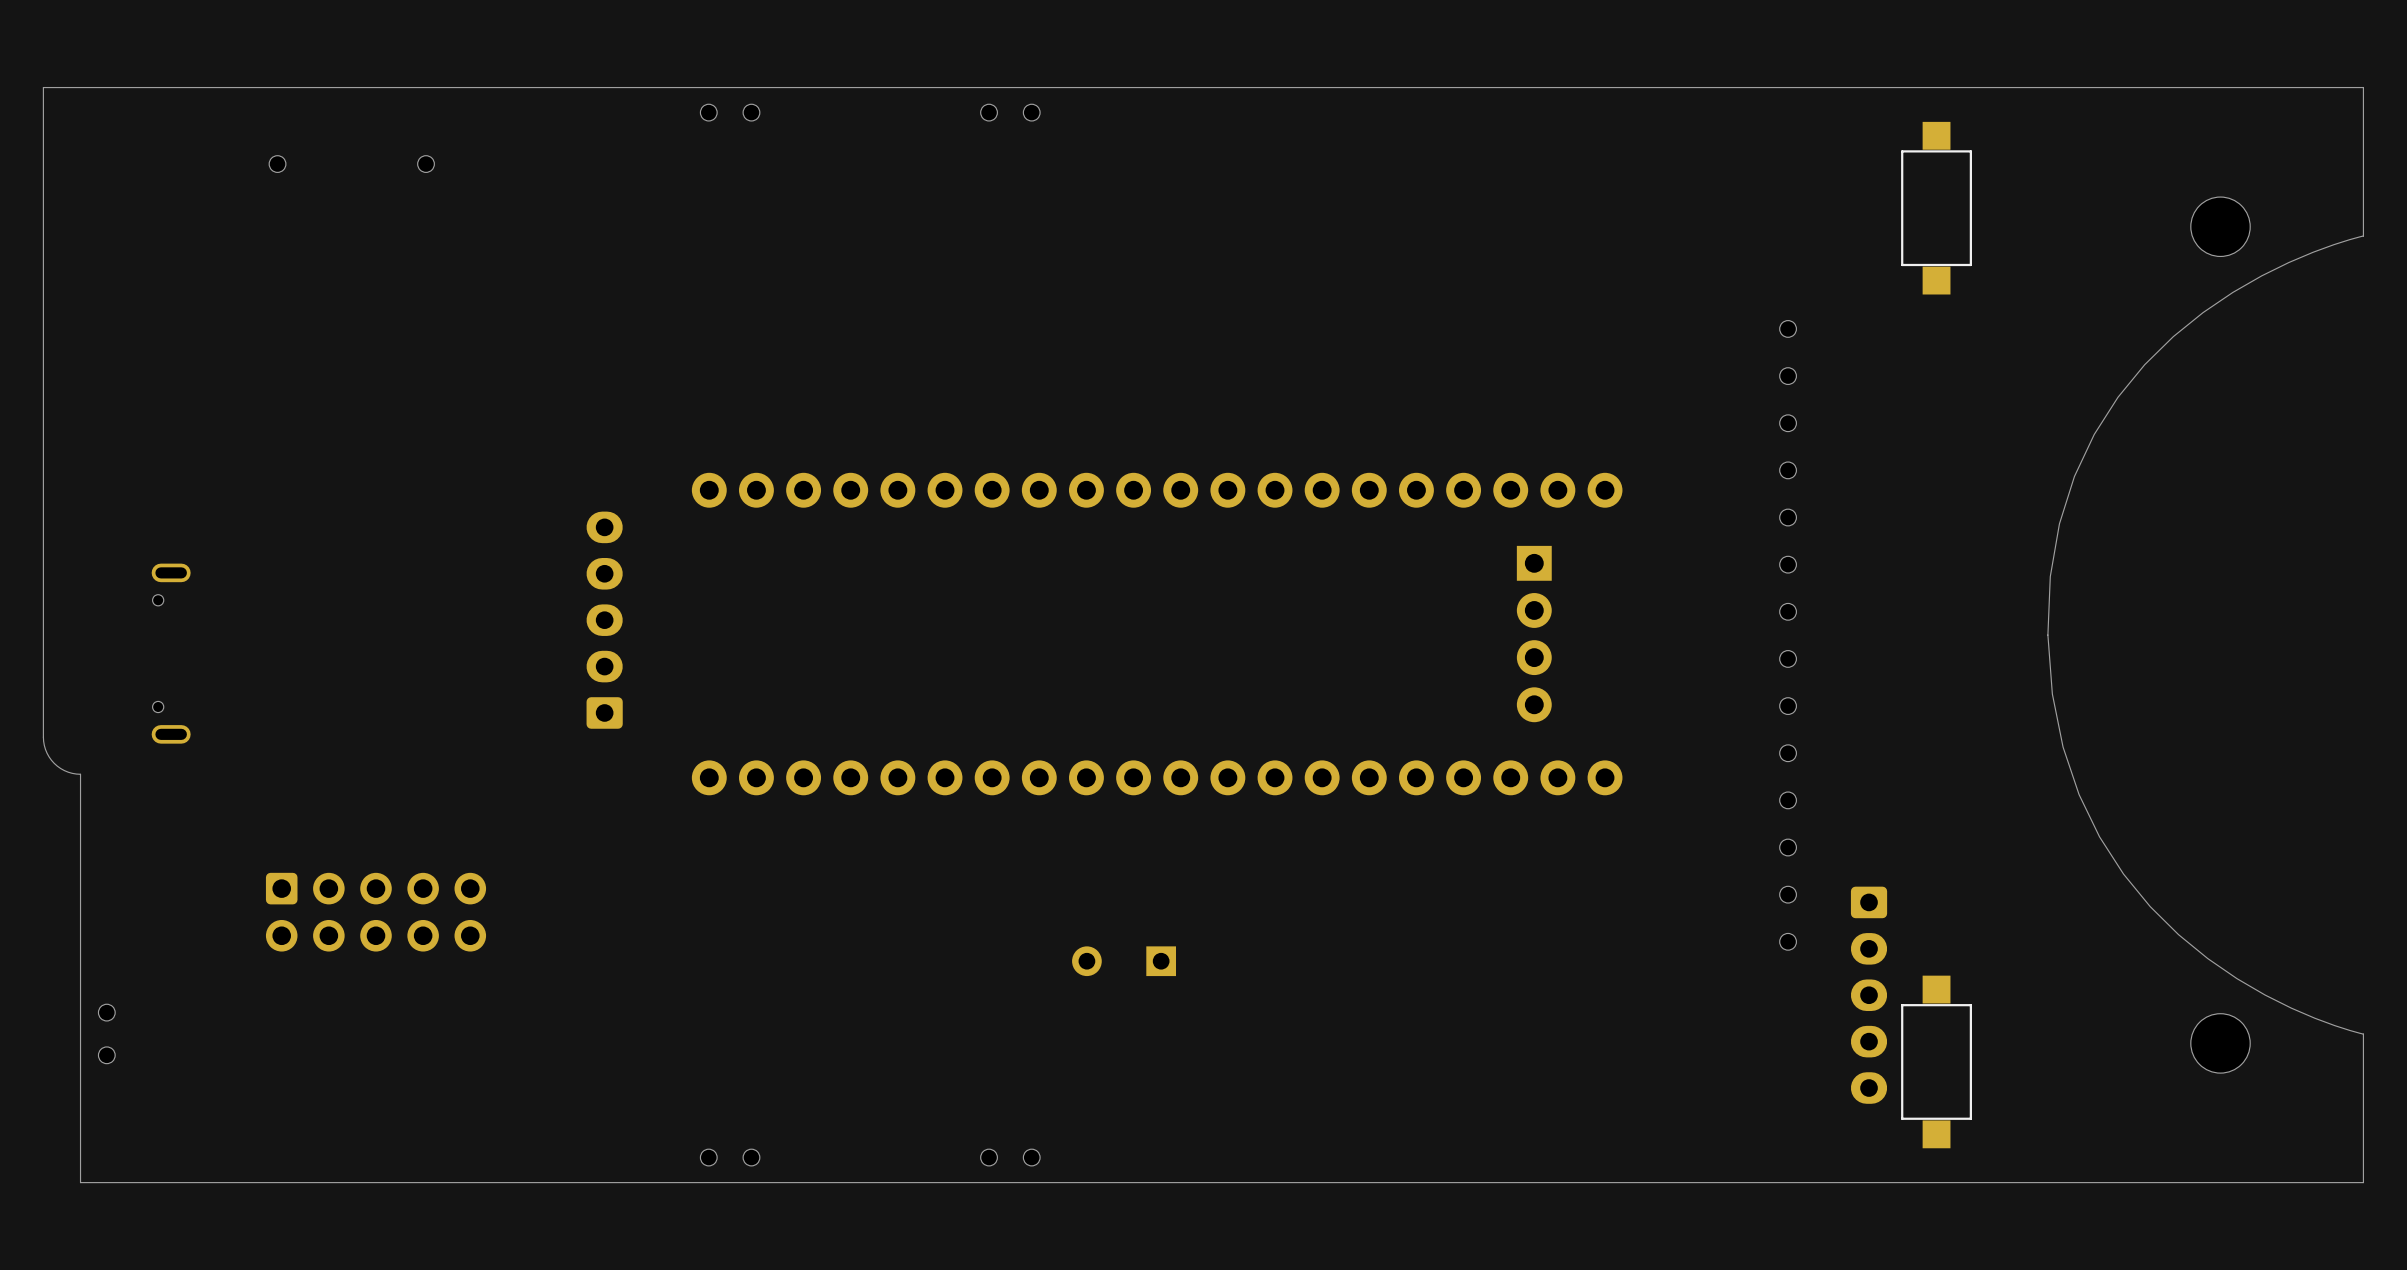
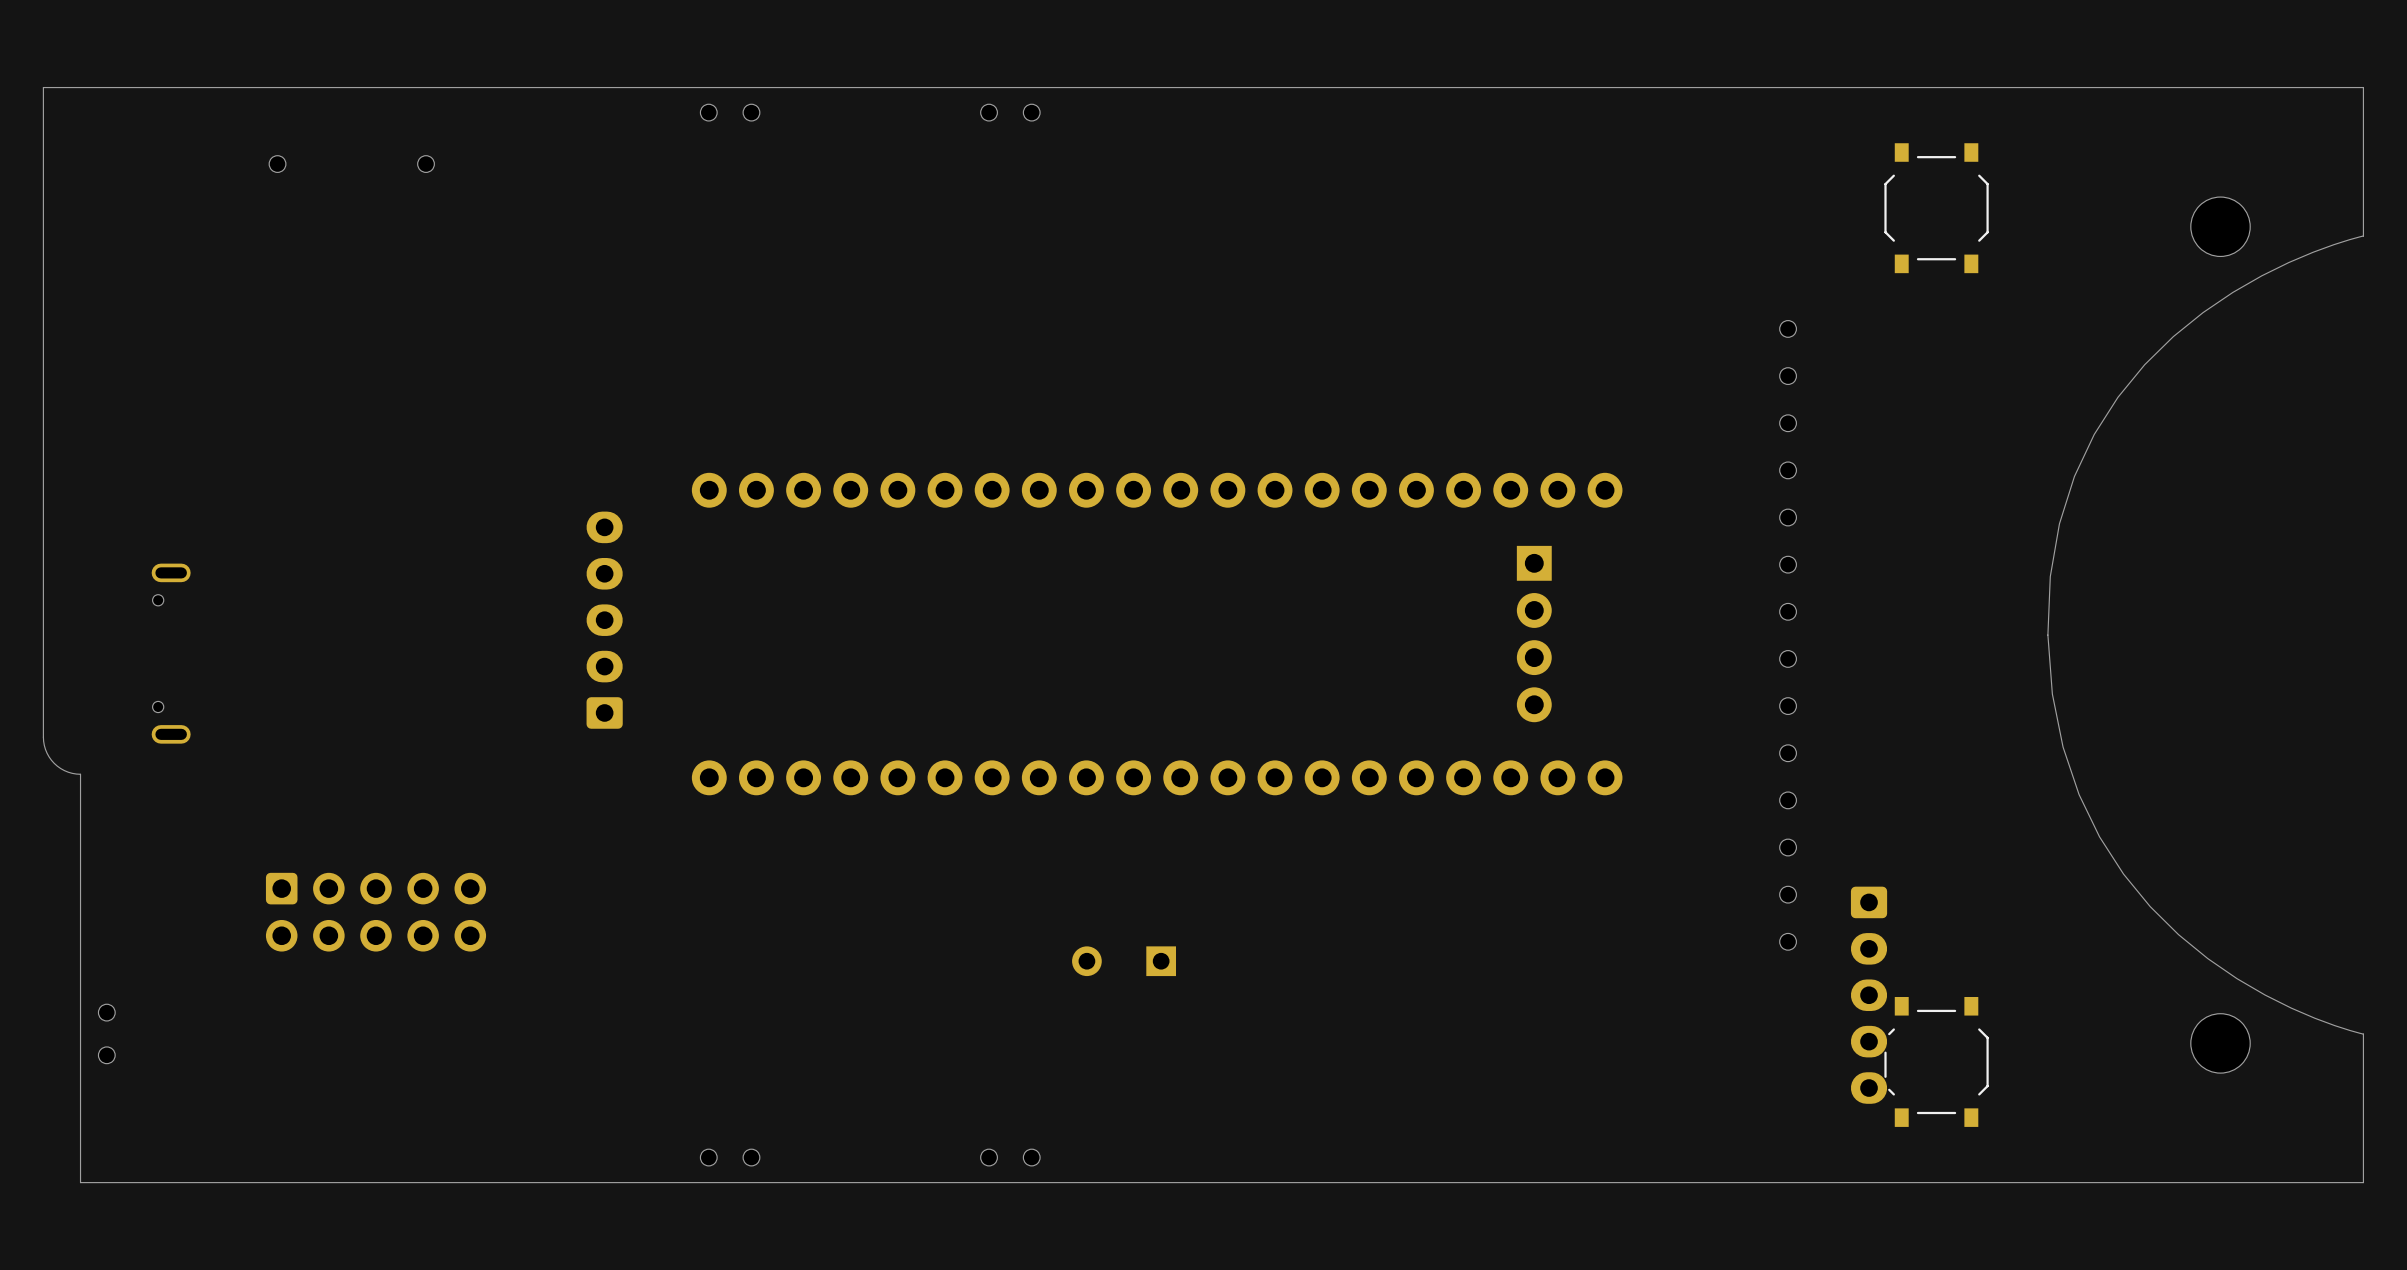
part footprint: [1901, 121, 1972, 295] -> [1884, 143, 1989, 274]
part footprint: [1901, 975, 1972, 1149] -> [1884, 997, 1989, 1127]

